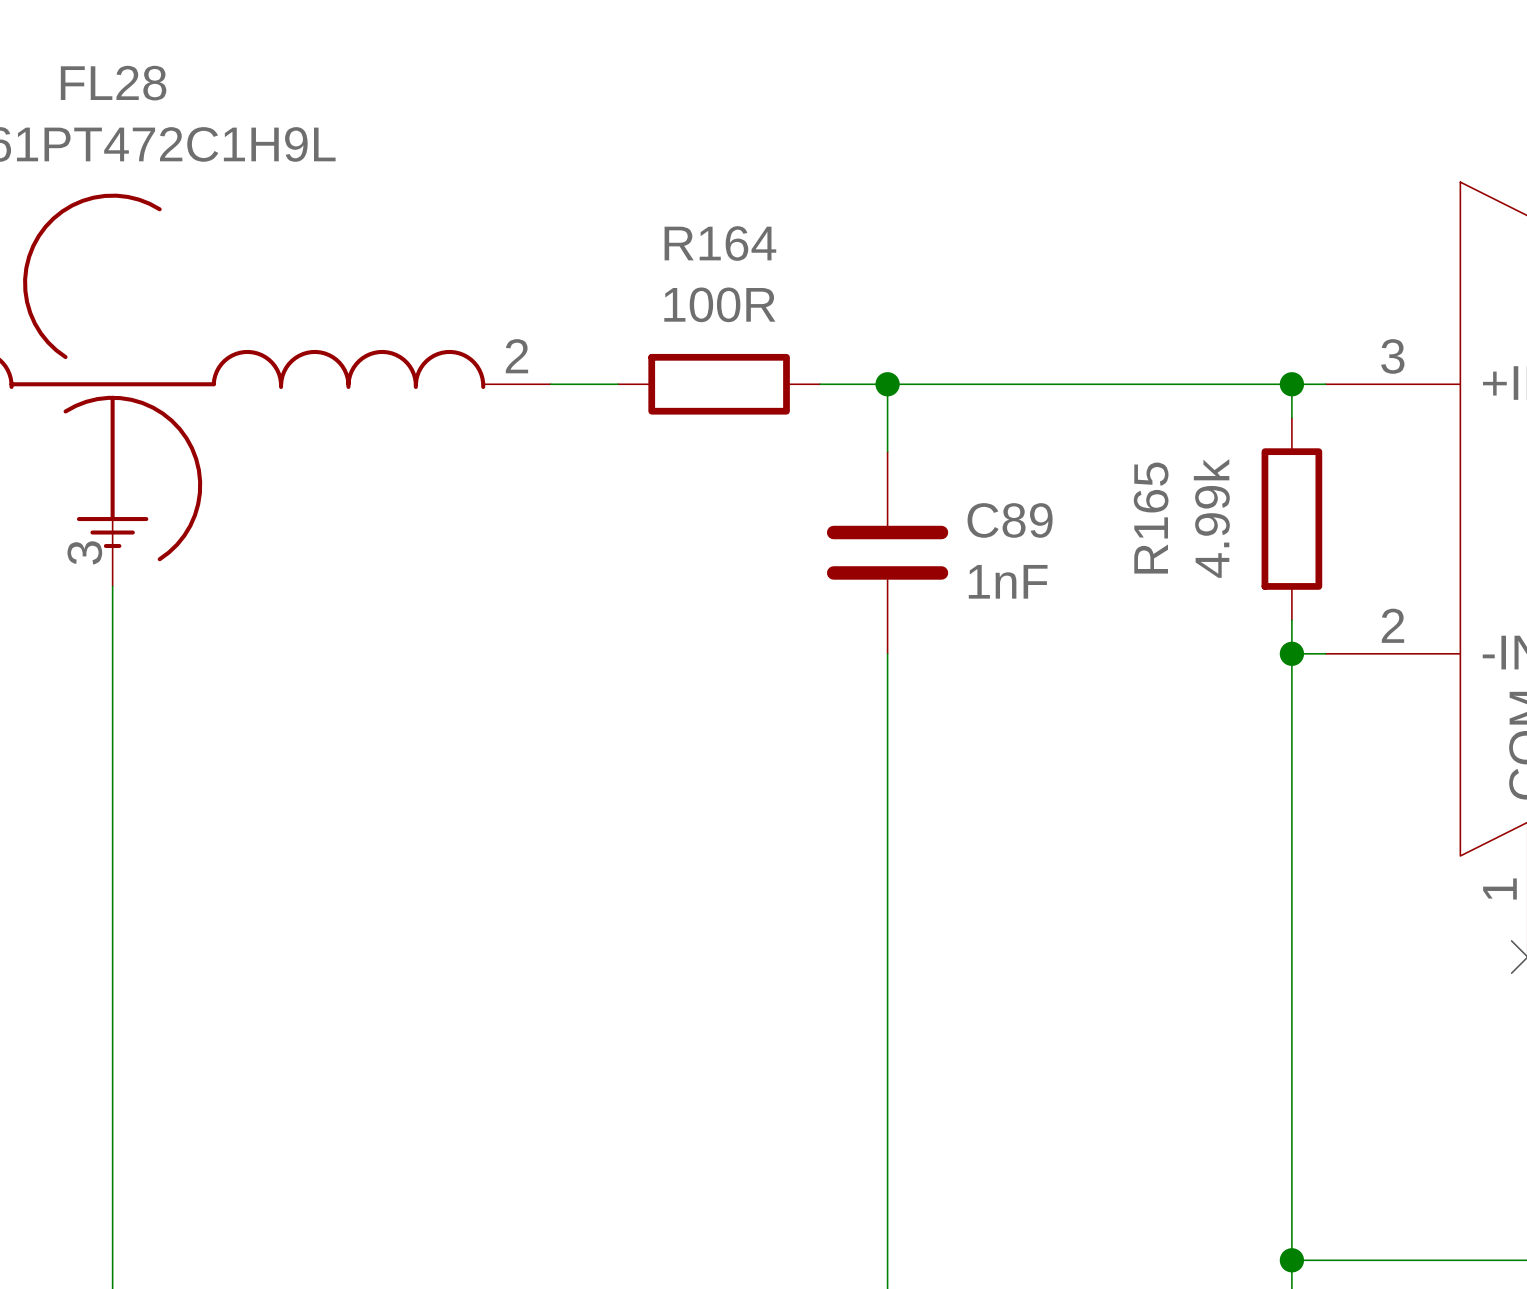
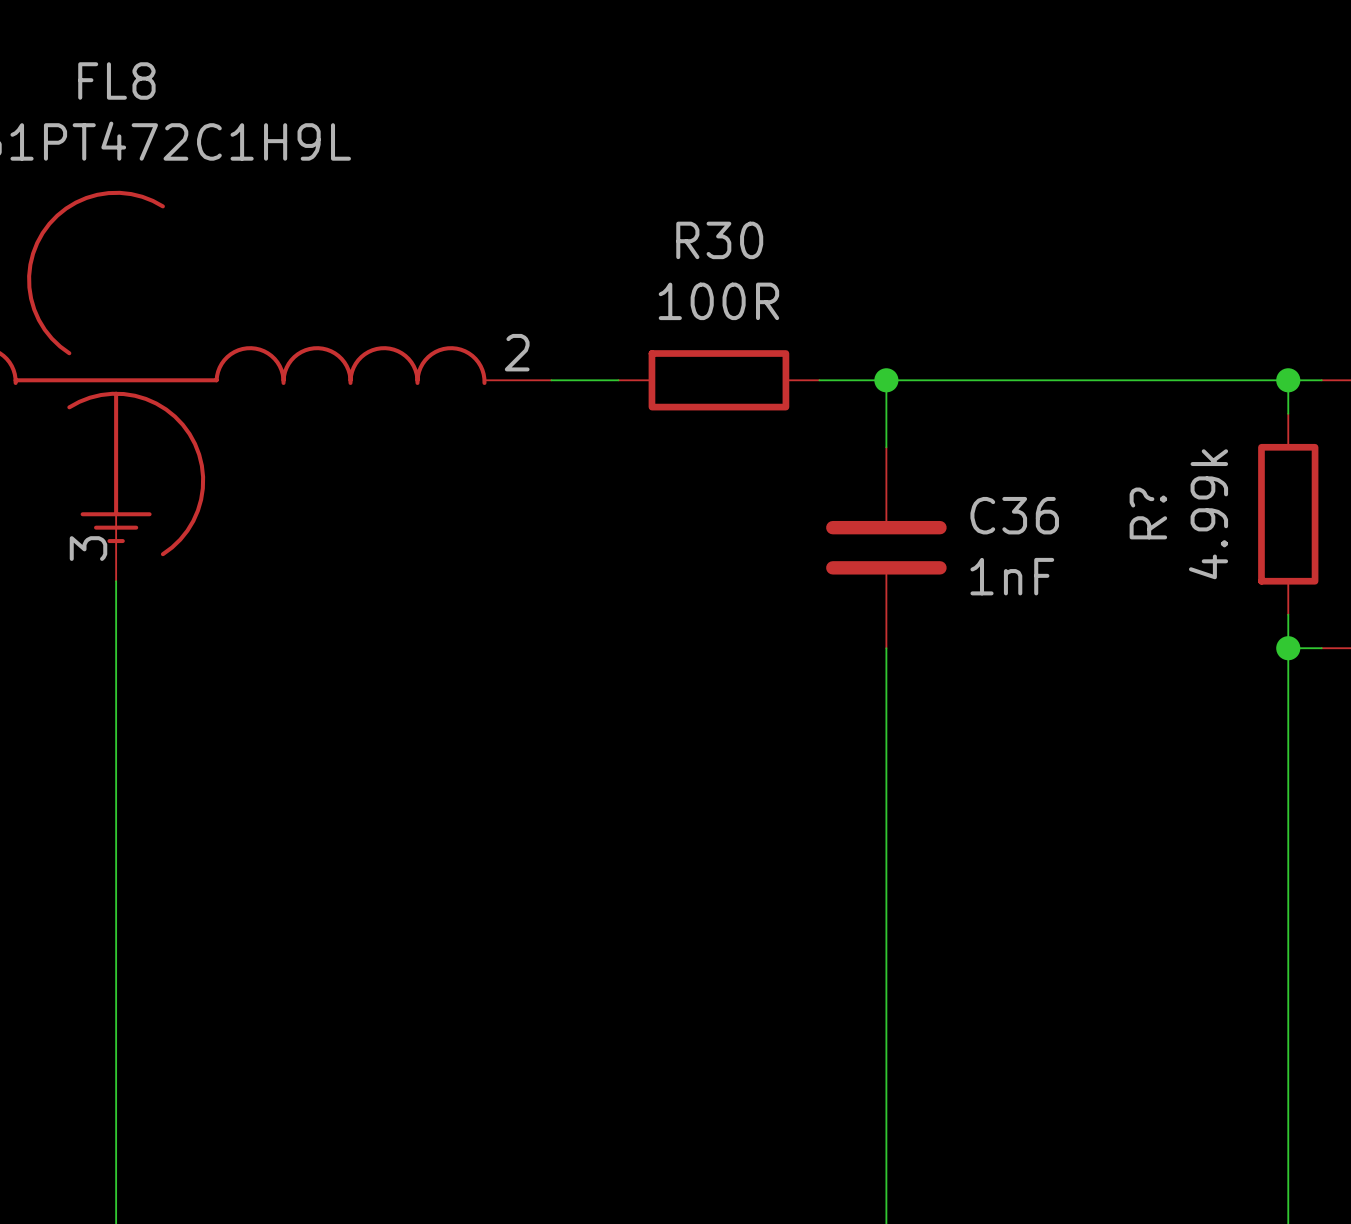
FL28 name: FL28 (113, 83) -> FL8 (116, 80)
R164 name: R164 (720, 243) -> R30 (719, 240)
R165 name: R165 (1151, 518) -> R? (1148, 513)
C89 name: C89 (1010, 520) -> C36 (1014, 515)

